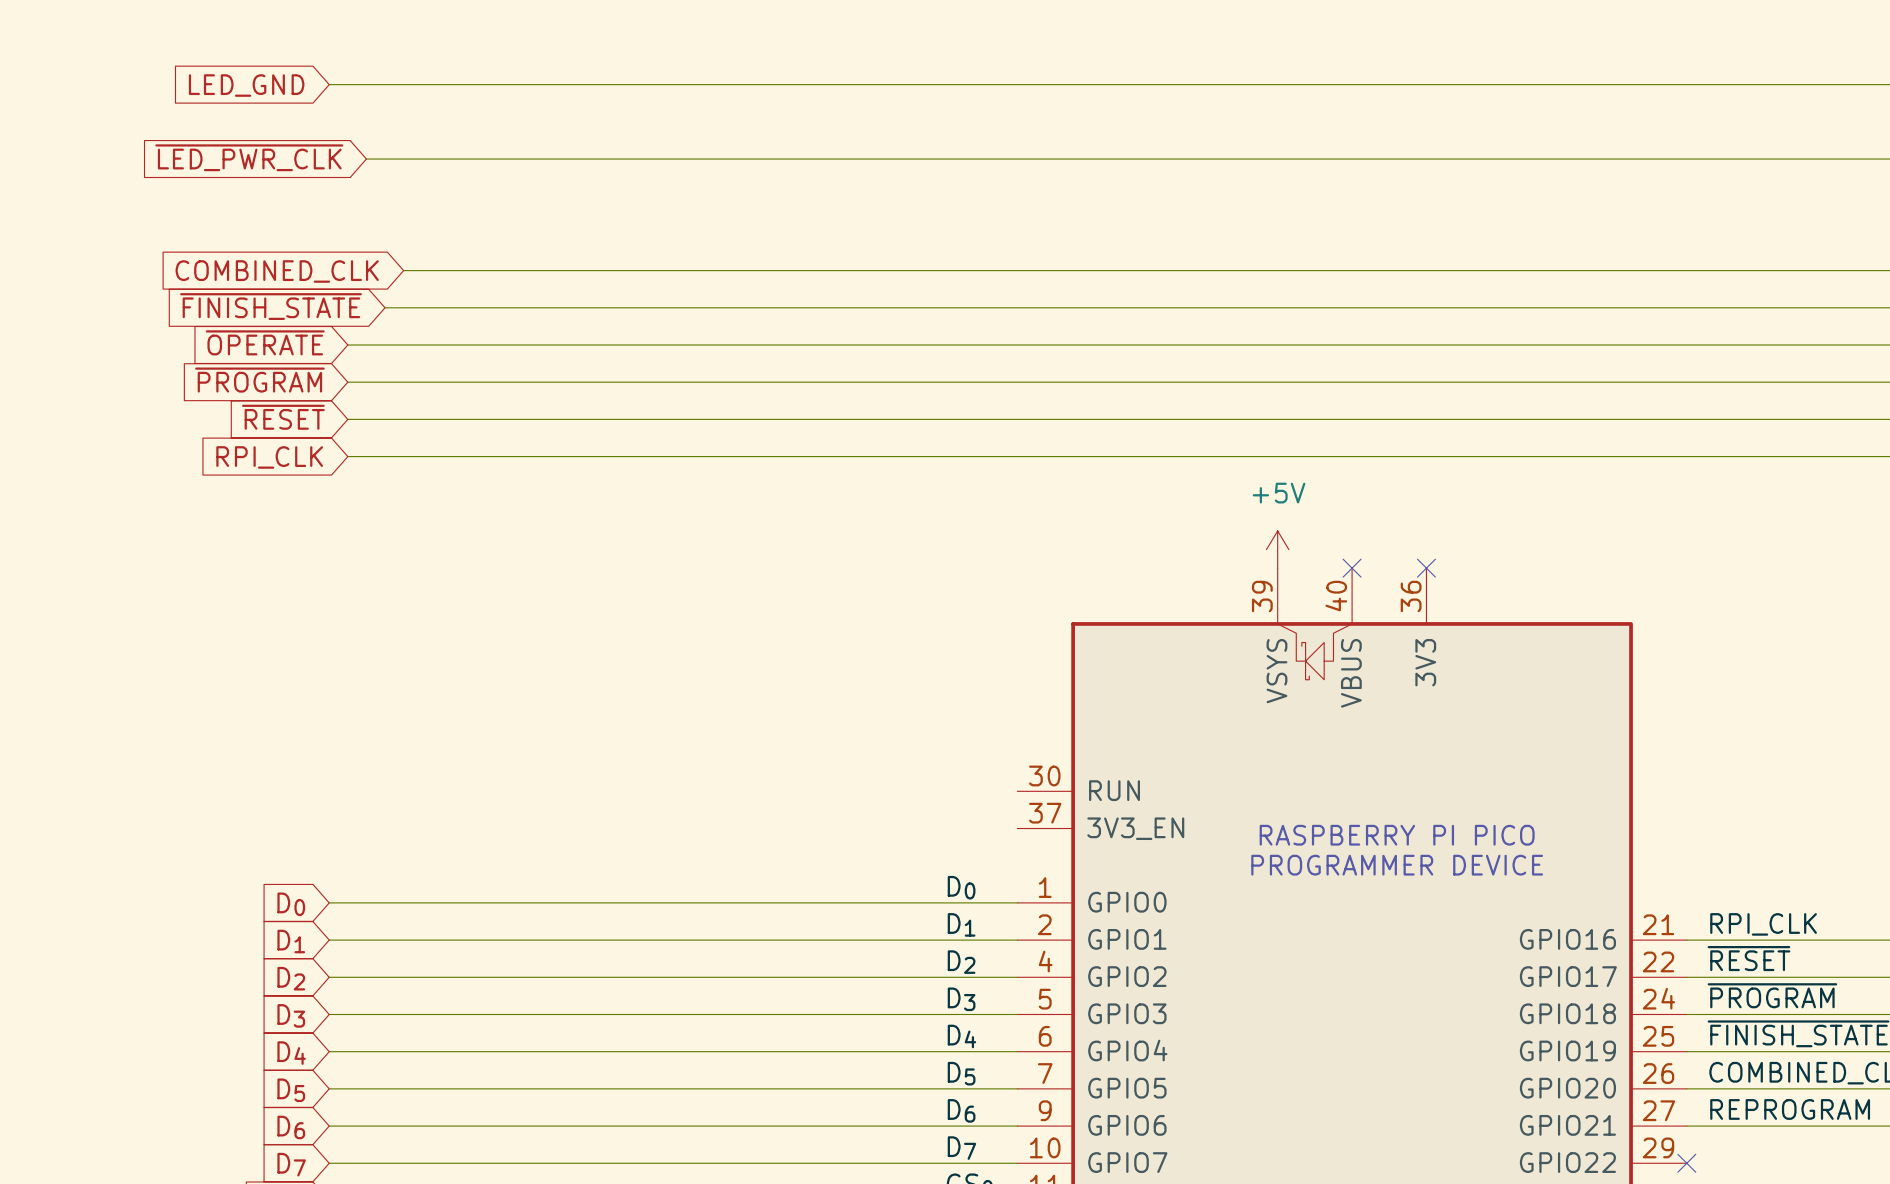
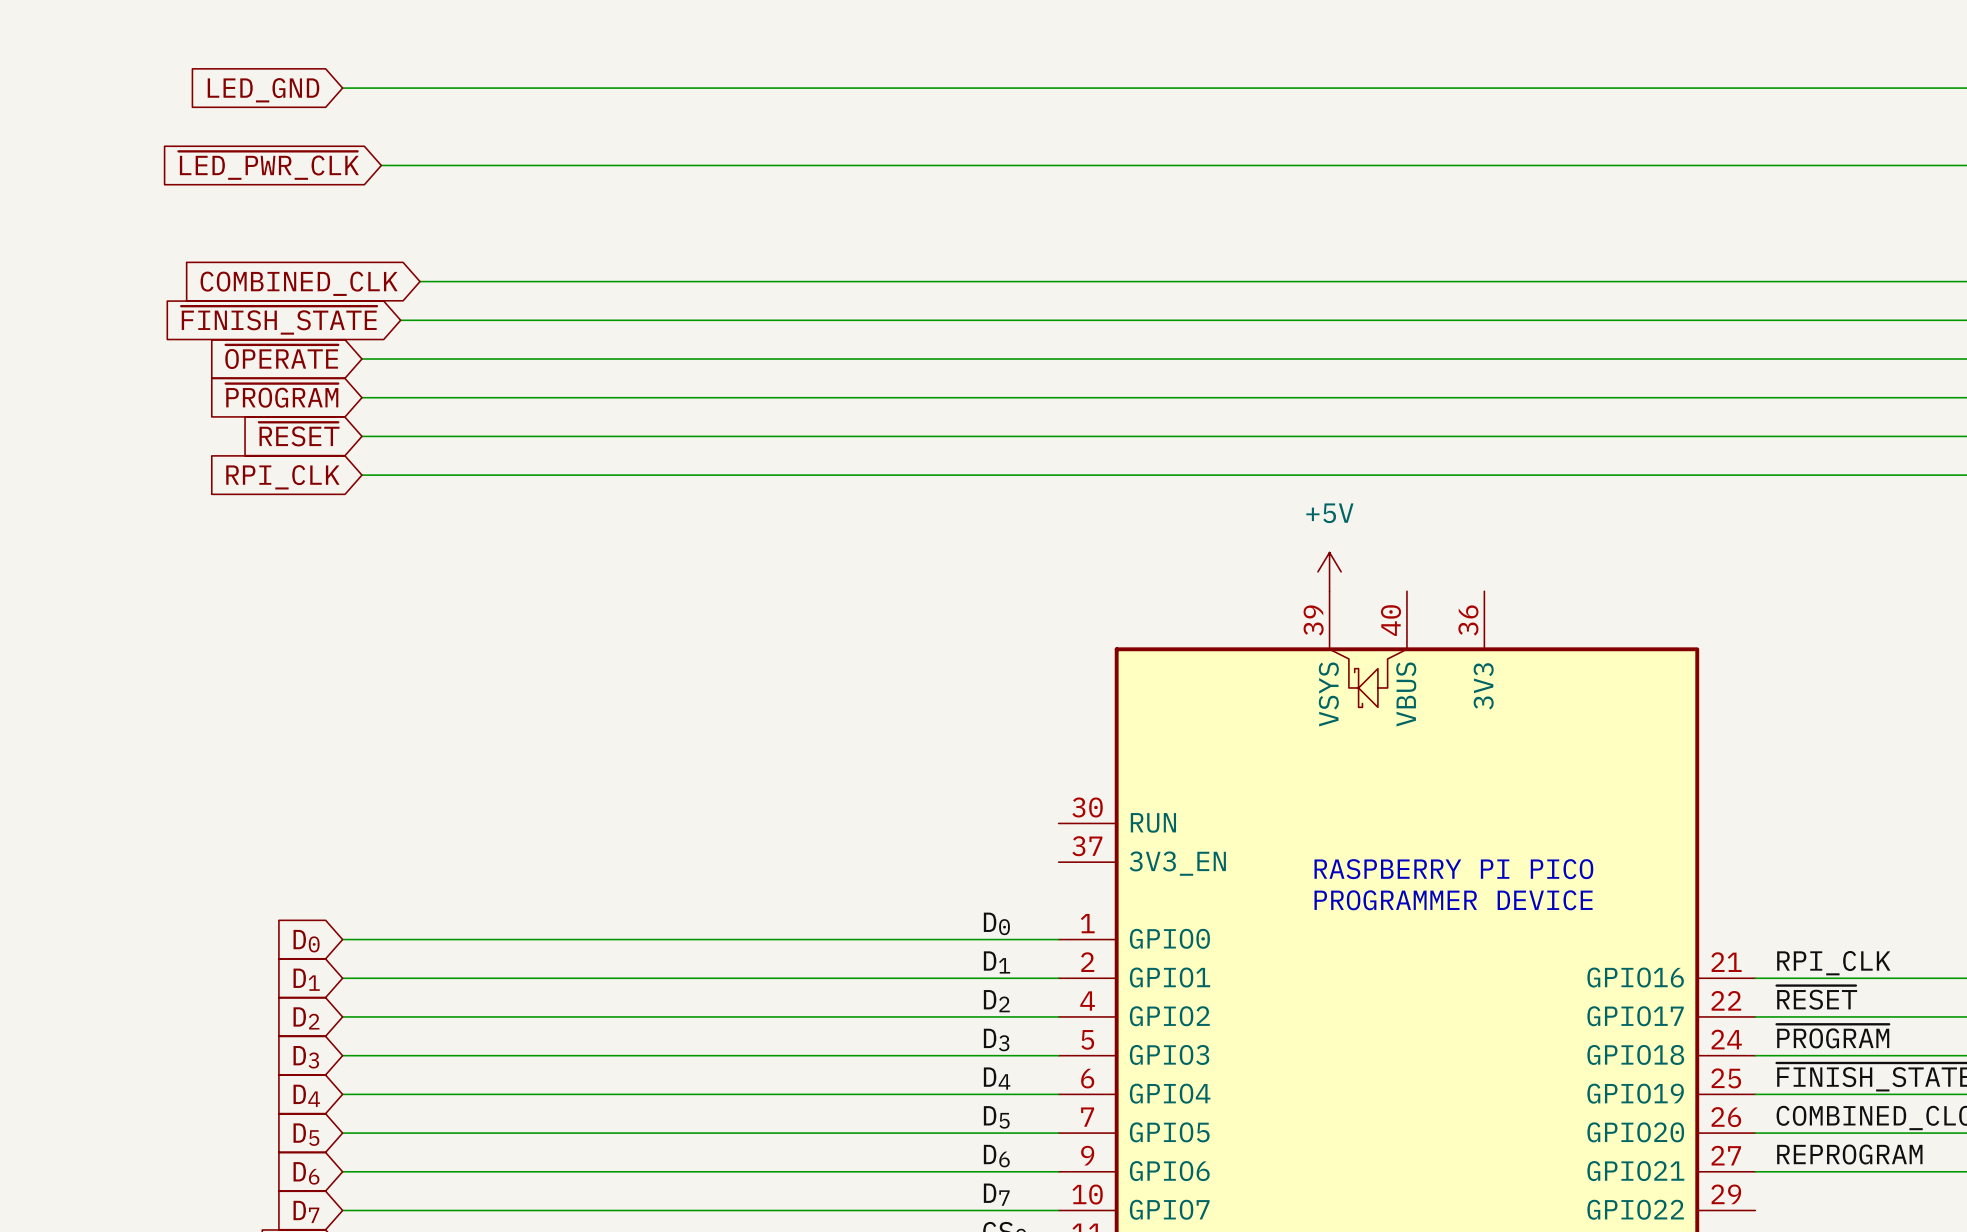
no-connect mark: (1352, 568) -> none
no-connect mark: (1426, 568) -> none
no-connect mark: (1686, 1163) -> none

